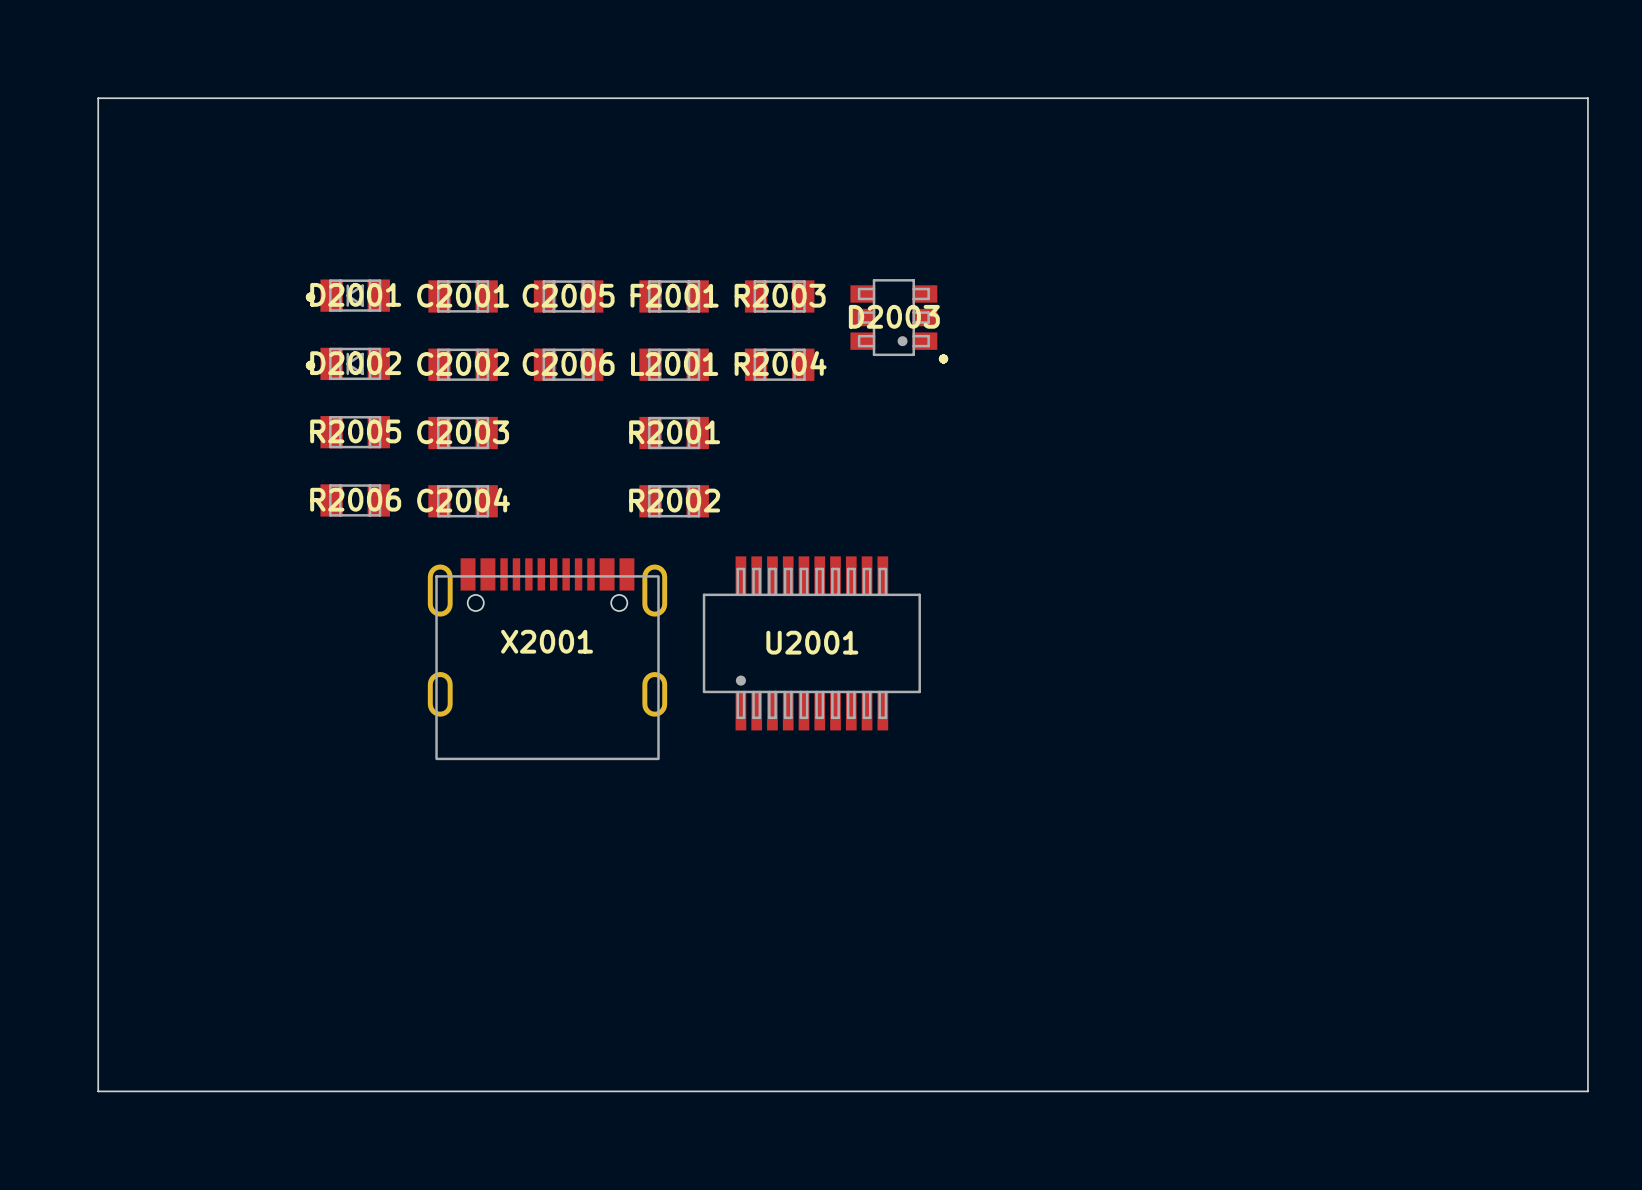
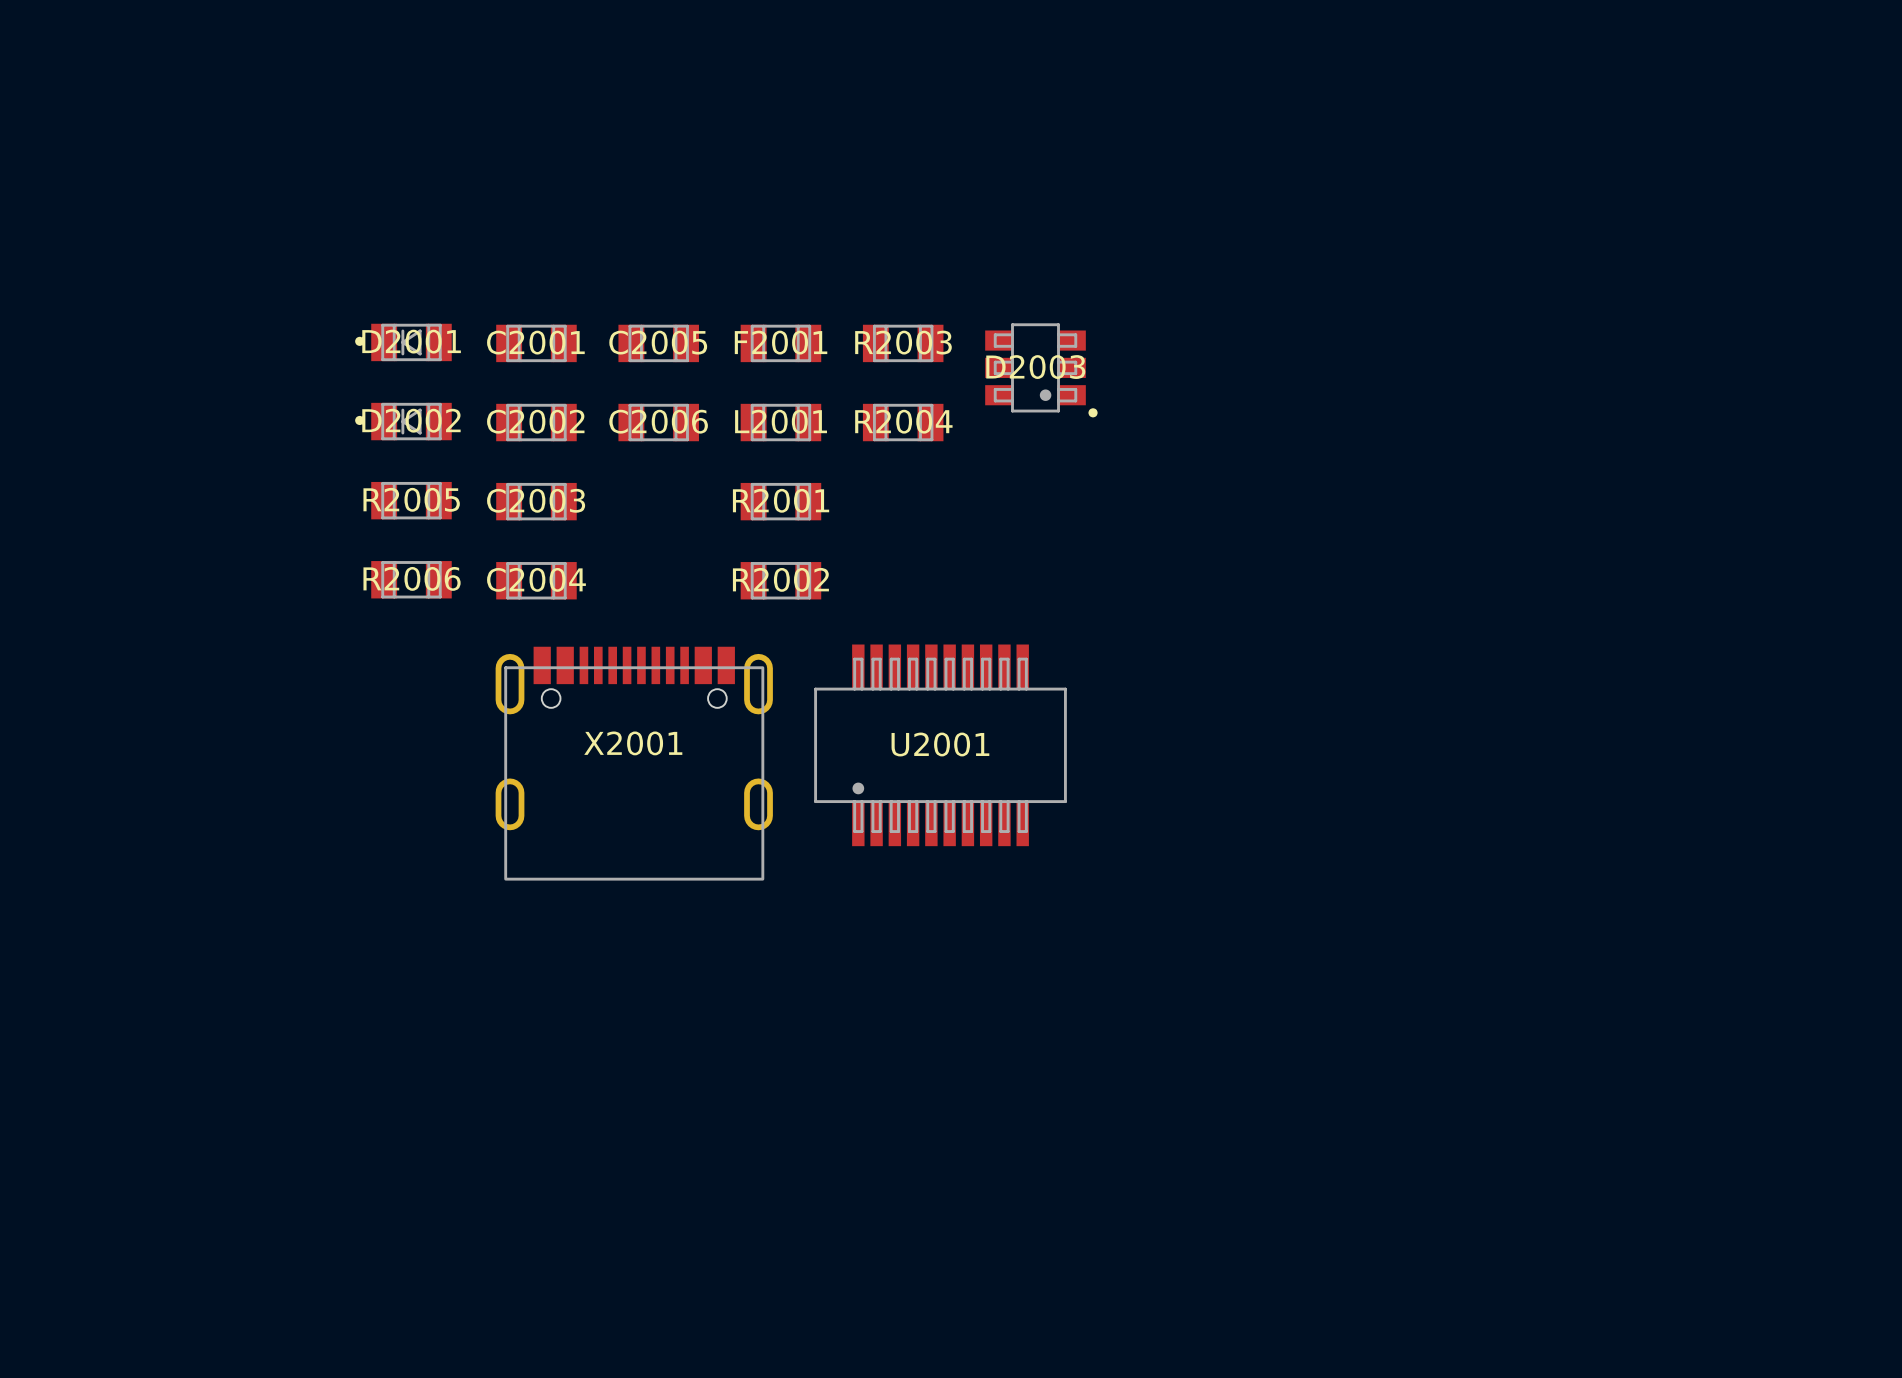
board edge: (98, 98) (1587, 98) (1587, 1091) (98, 1091) (98, 98) -> none

